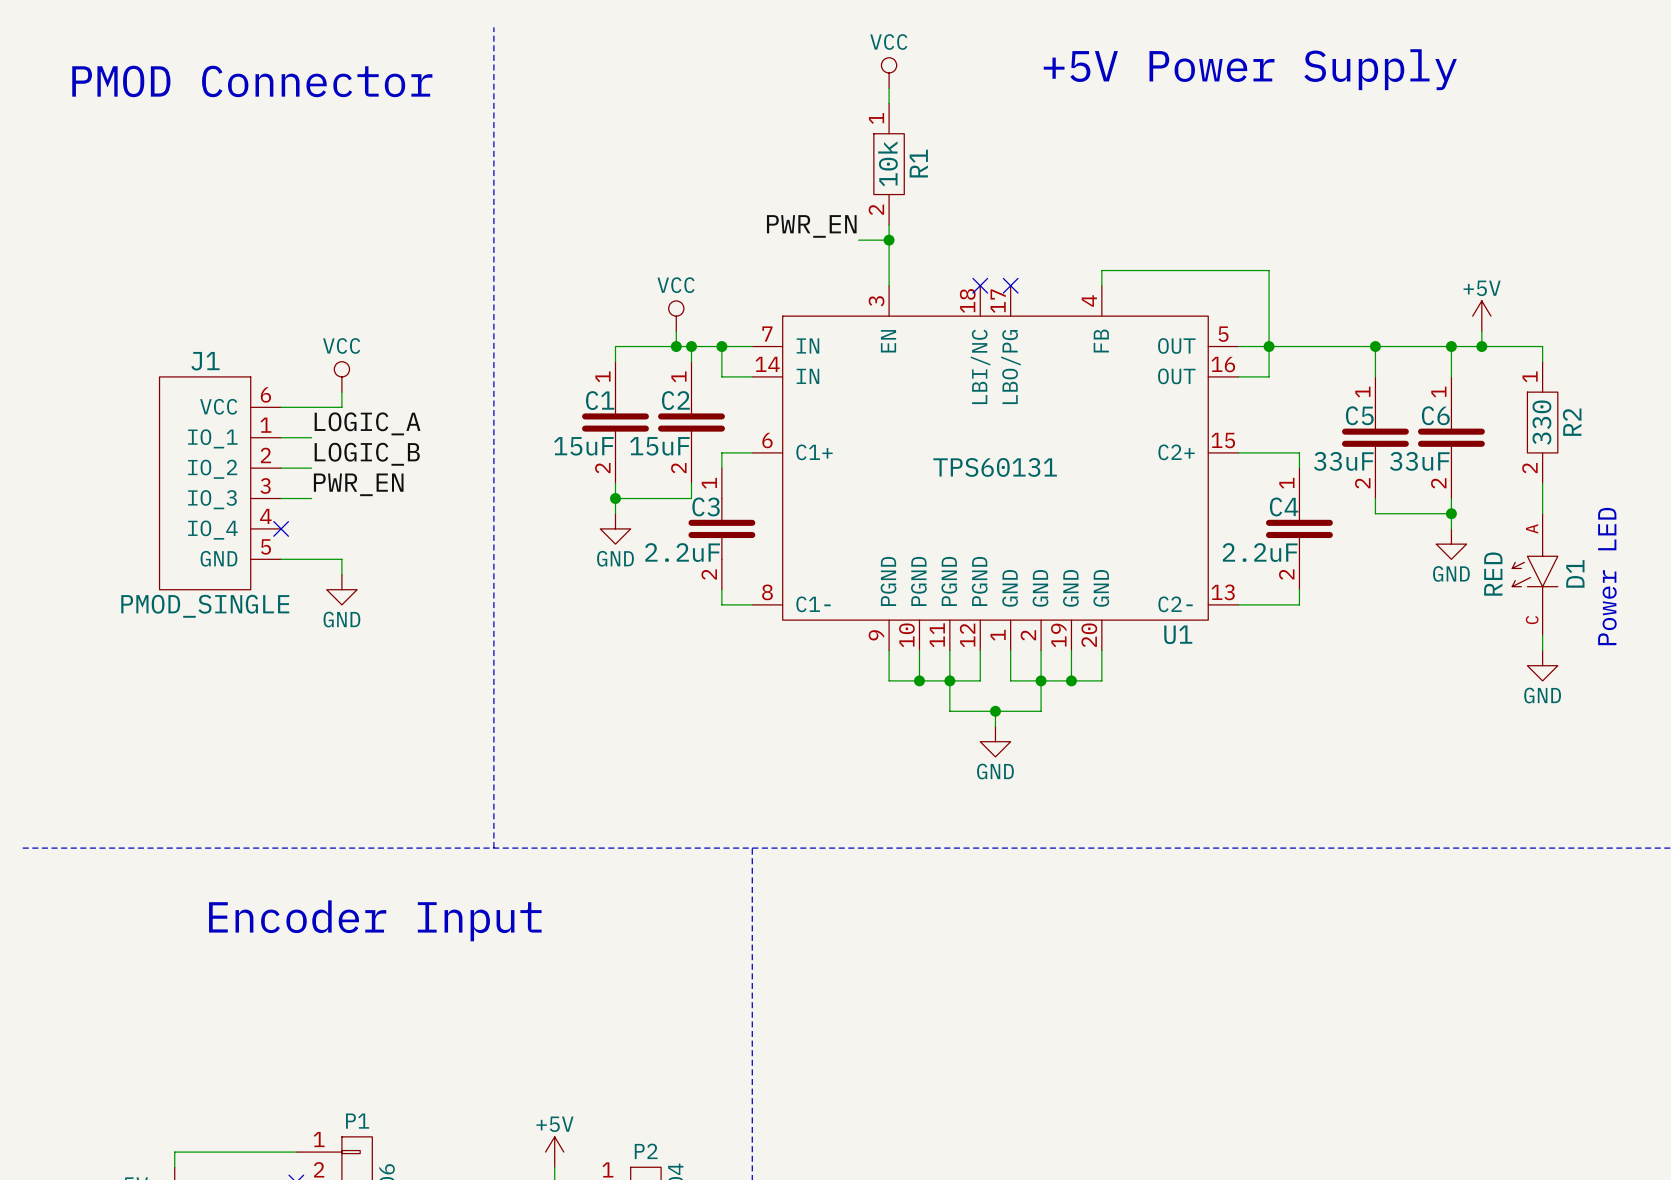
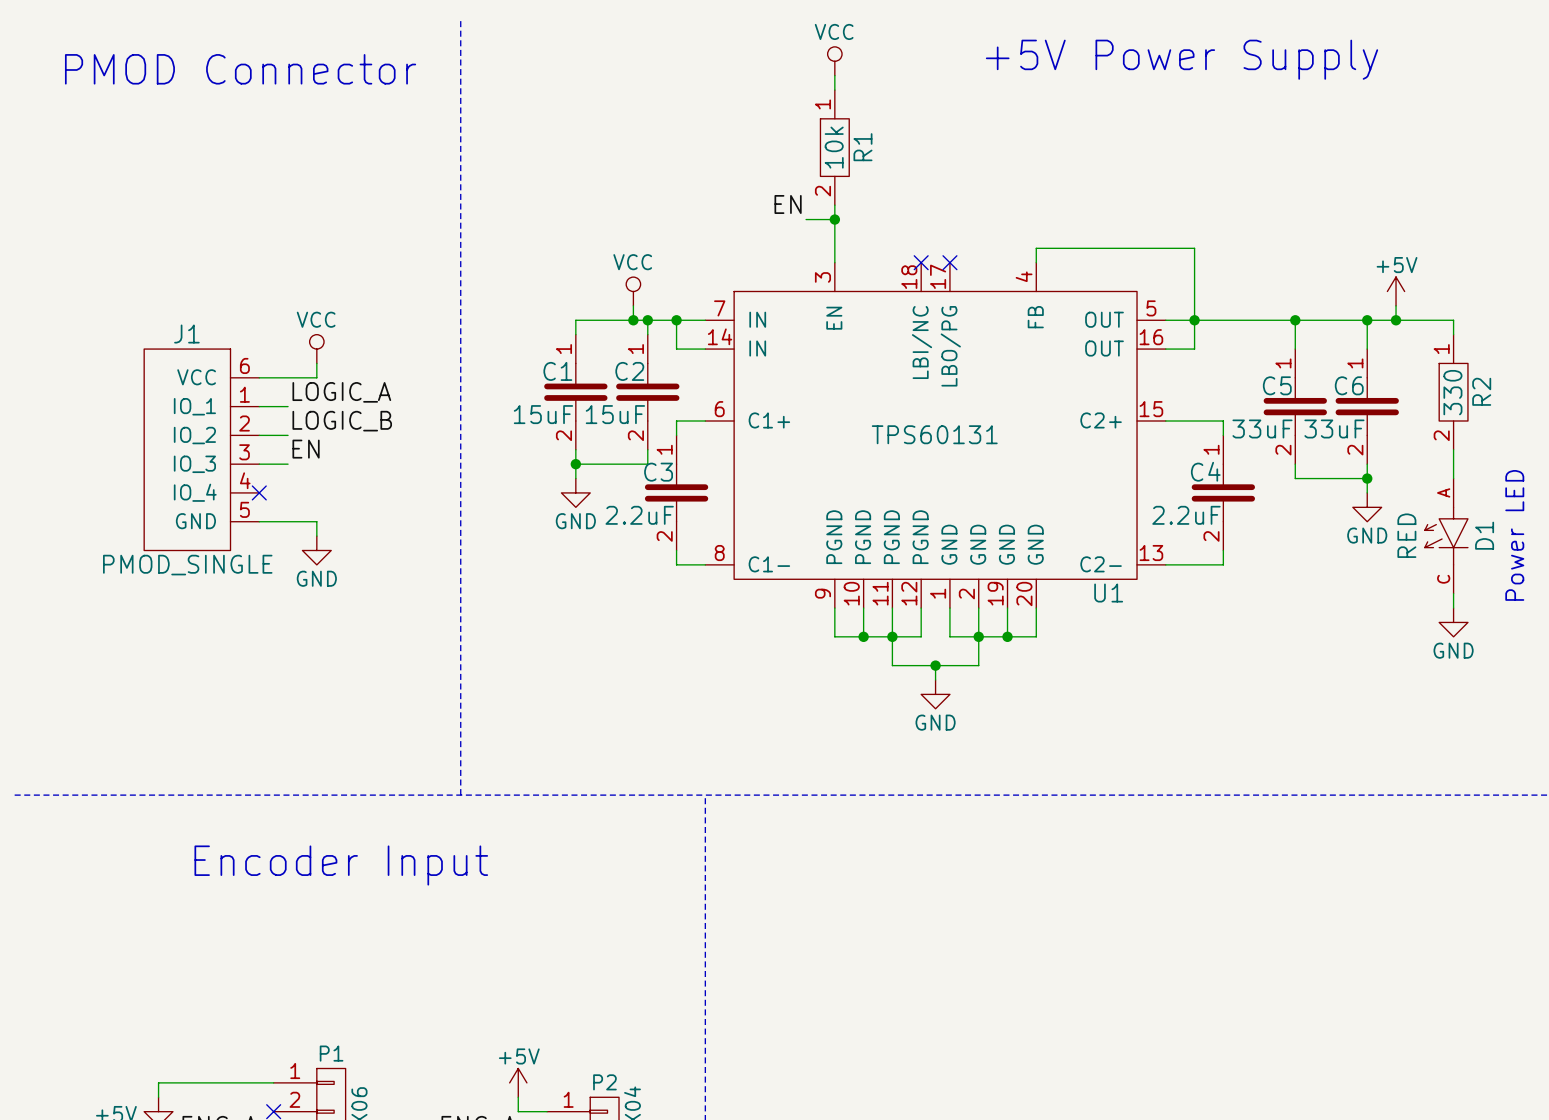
label: PWR_EN (811, 226) -> EN (788, 204)
label: PWR_EN (358, 484) -> EN (306, 449)

